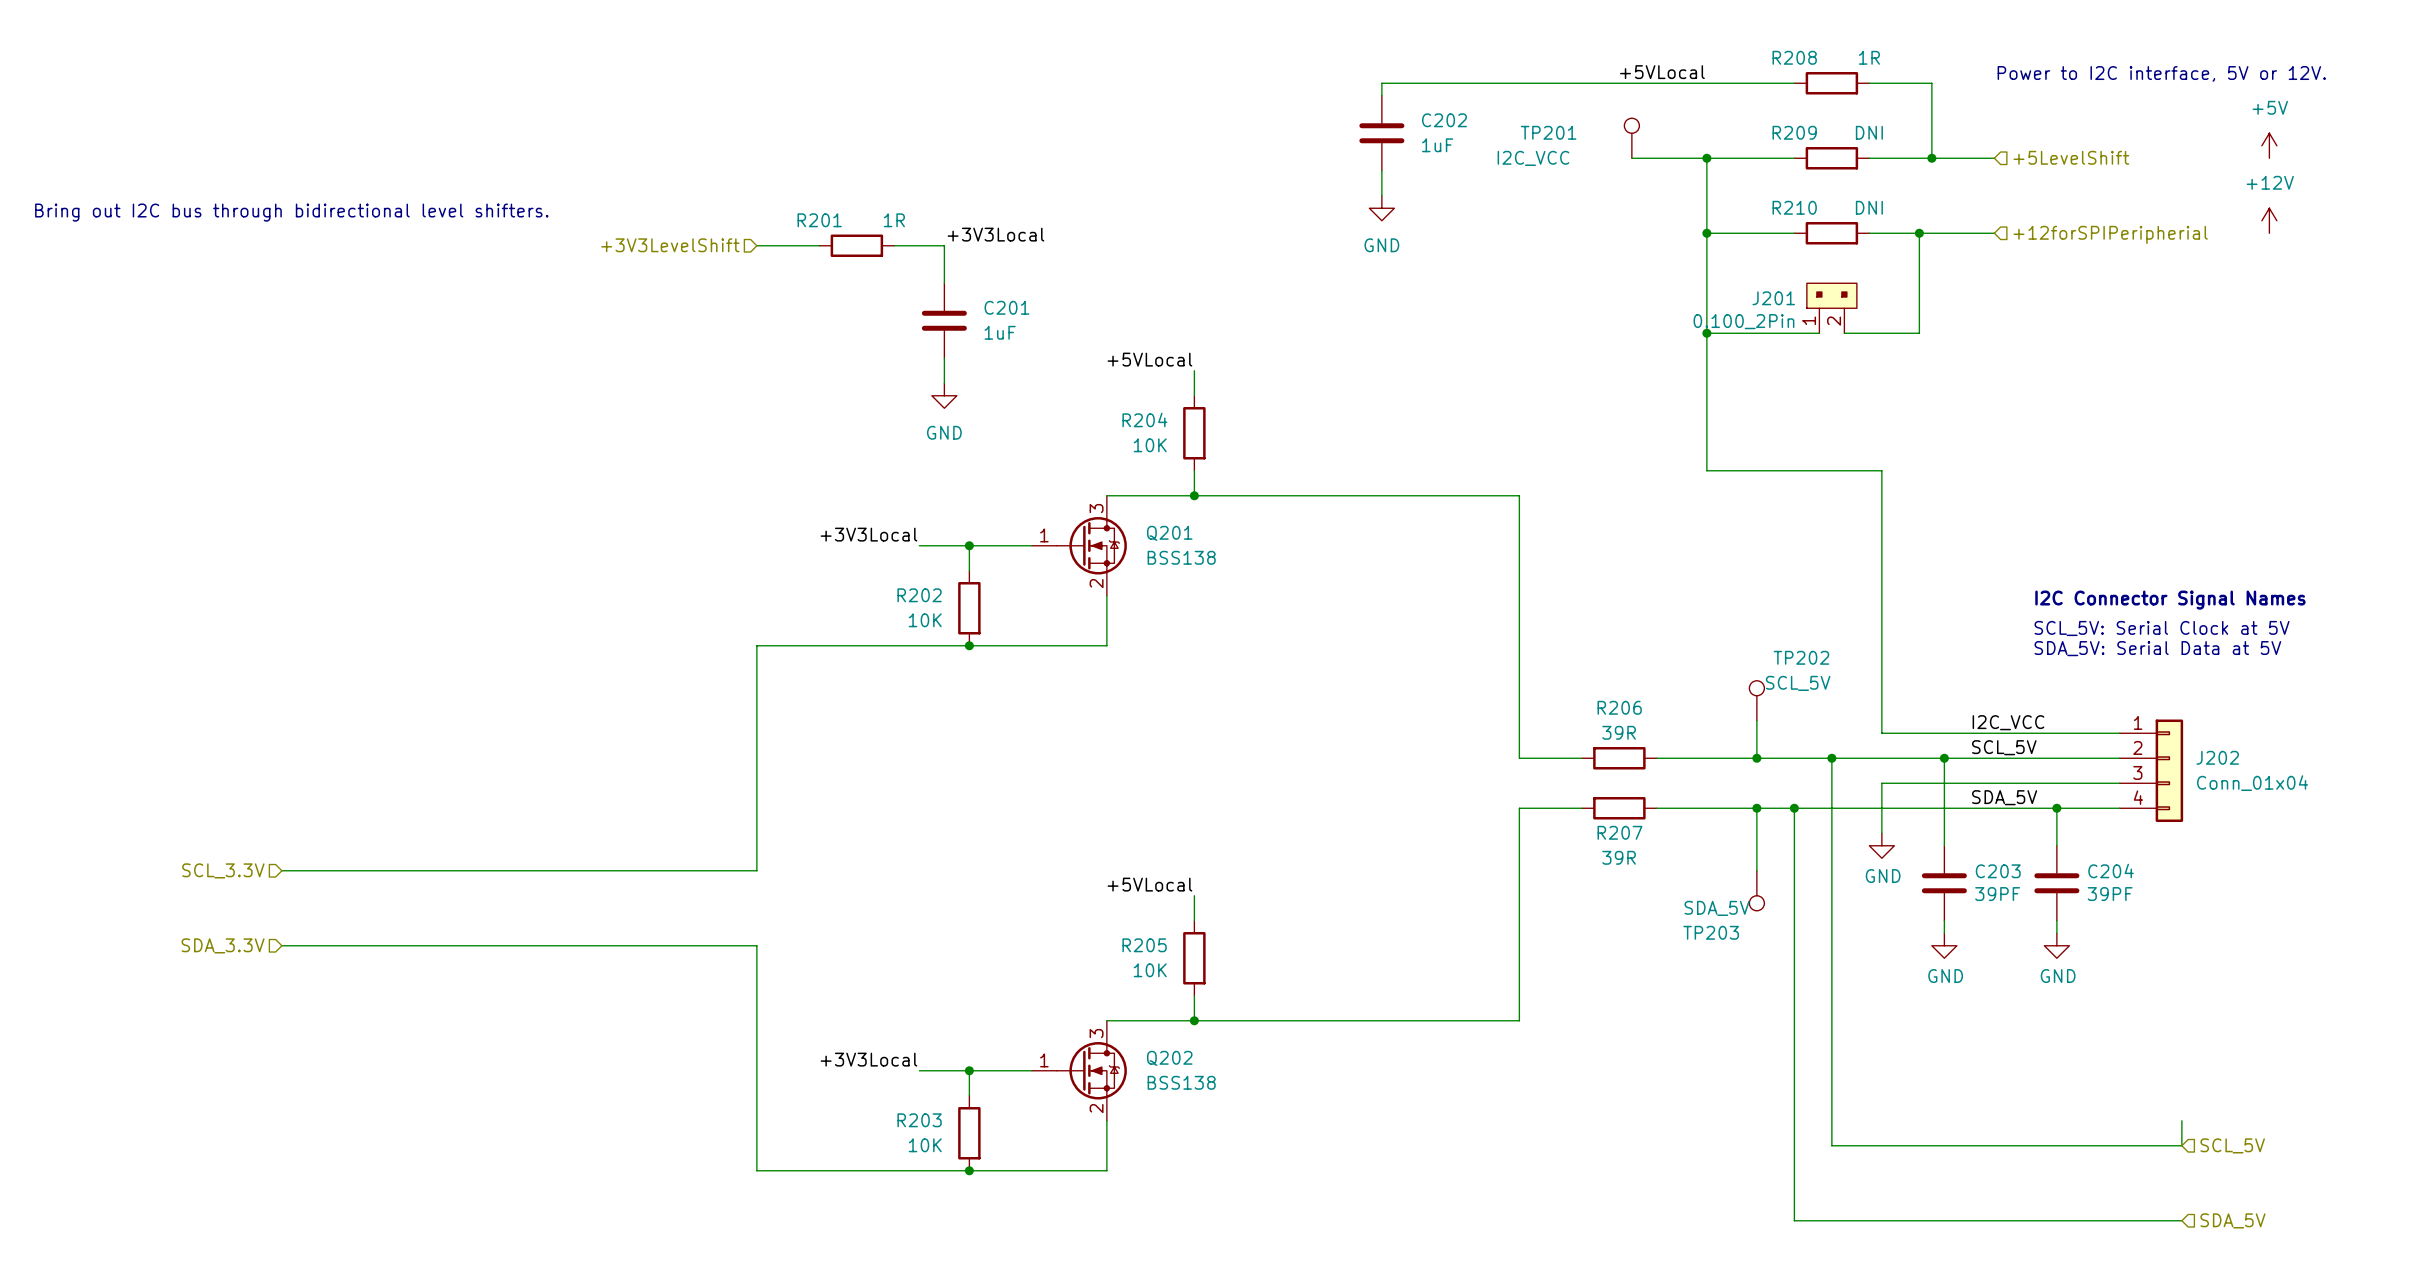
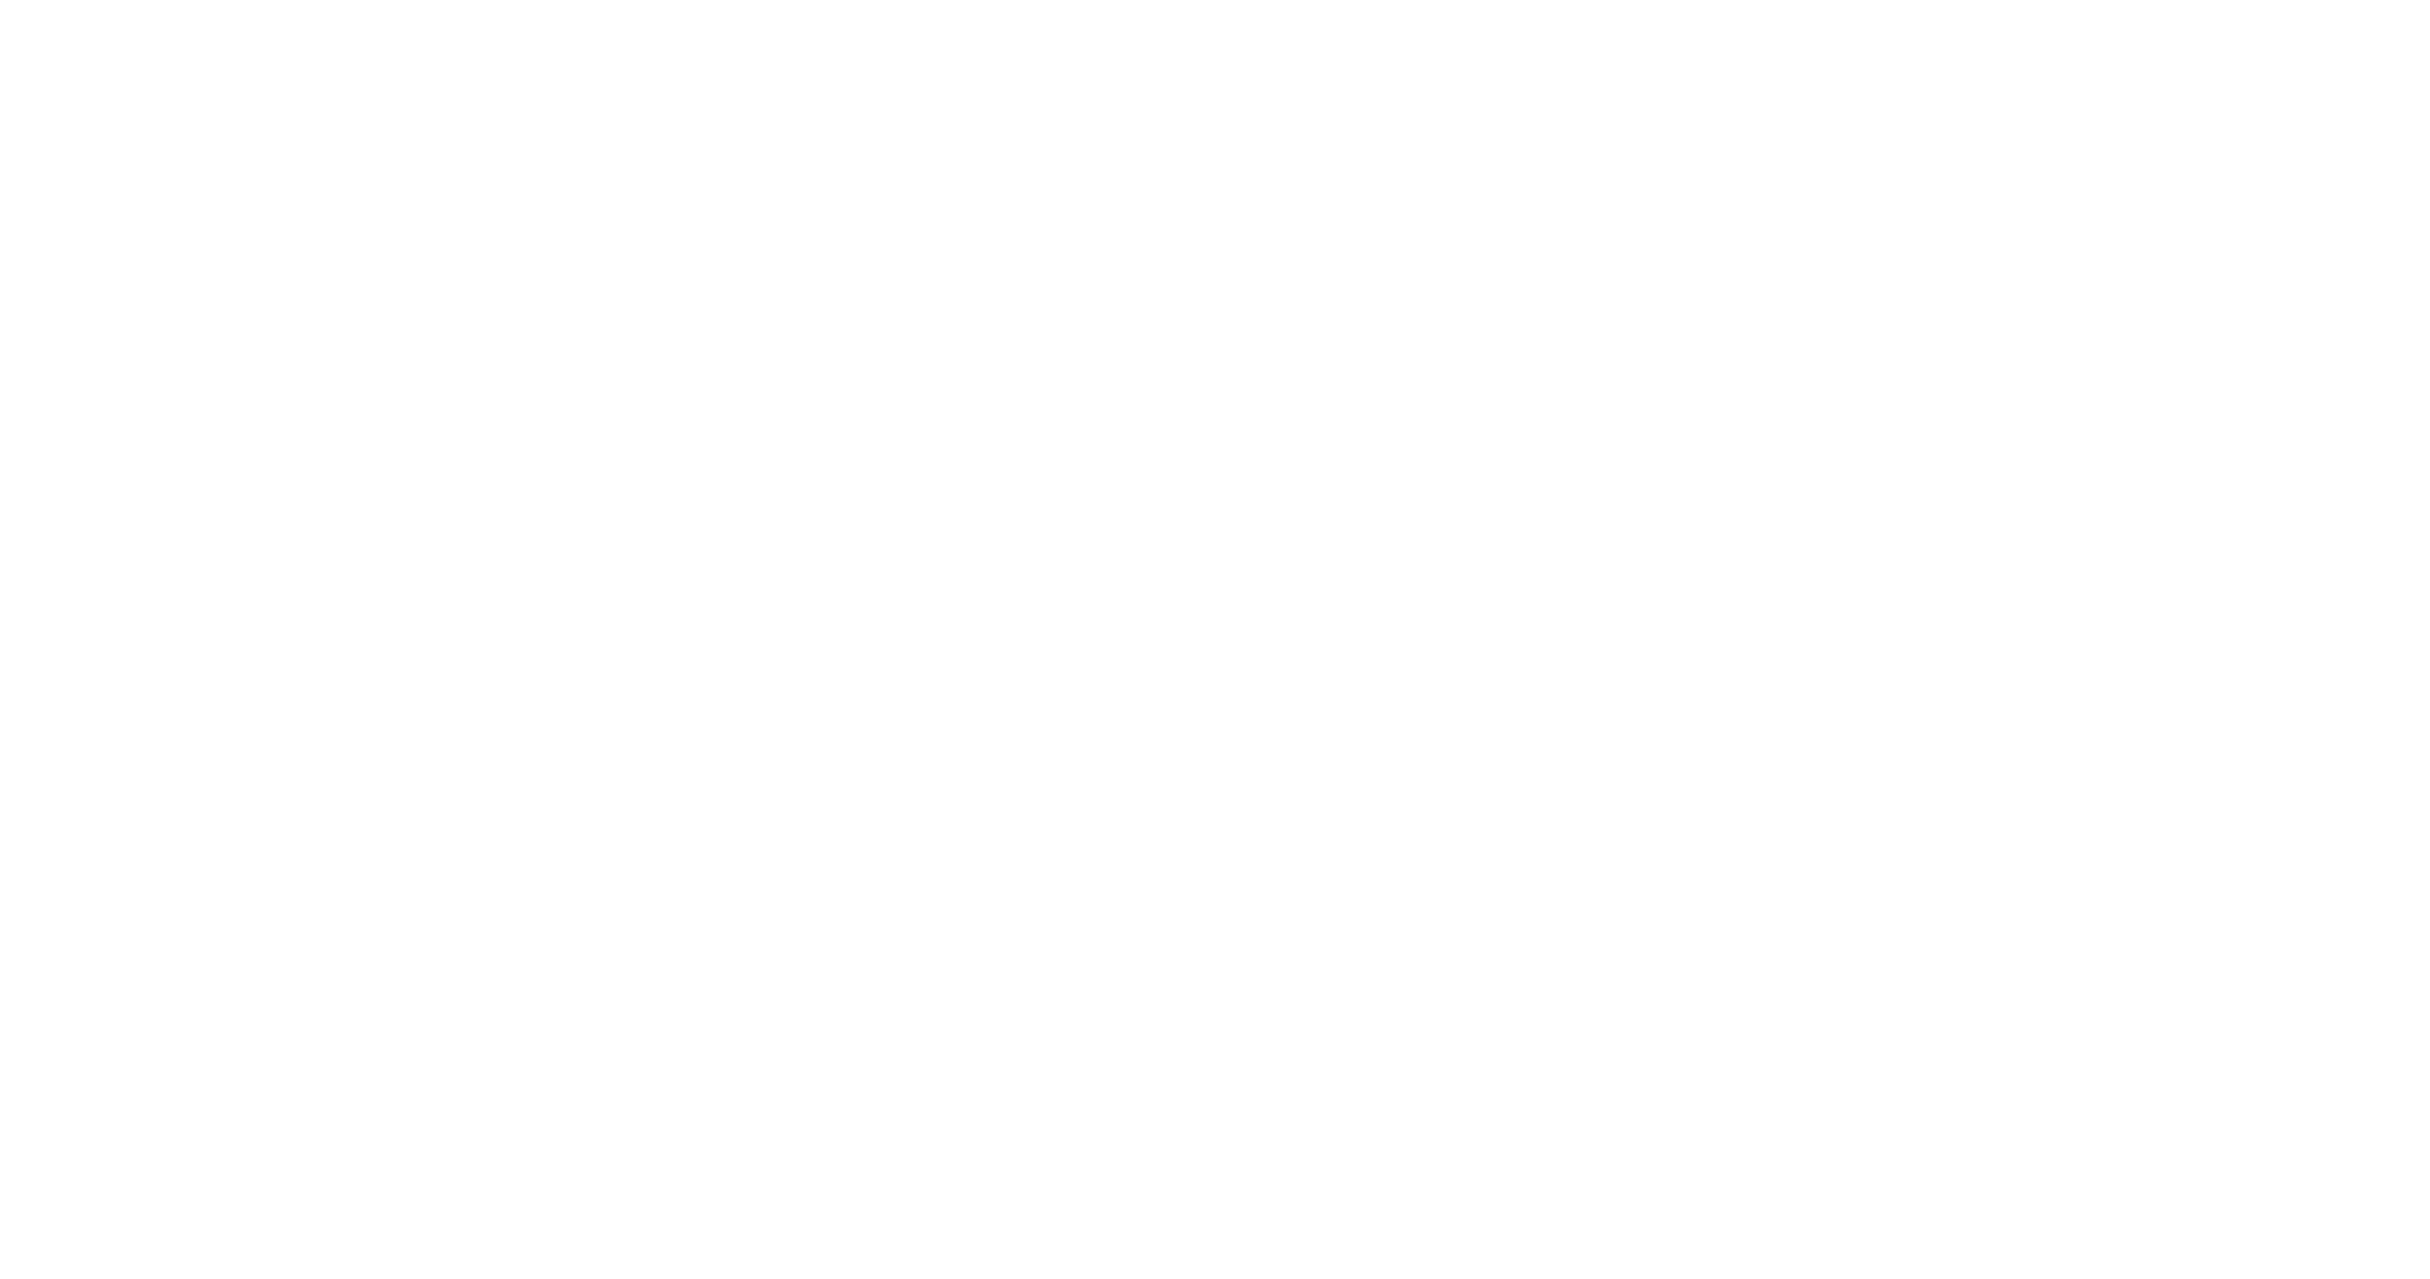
label: +5VLocal (1662, 72) -> none
text: Power to I2C interface, 5V or 12V. (2161, 73) -> none
wire: (1794, 83) (1381, 83) (1381, 95) -> none
R208: 1R (1831, 83) -> none
wire: (1869, 83) (1931, 83) (1931, 158) -> none
C202: 1uF (1381, 133) -> none
TP201: I2C_VCC (1631, 138) -> none
power symbol: +5V (2269, 145) -> none
hierarchical label: +5LevelShift (2071, 157) -> none
wire: (1631, 158) (1794, 158) -> none
wire: (1706, 158) (1706, 470) (1881, 470) (1881, 733) (2119, 733) -> none
junction: (1706, 158) -> none
R209: DNI (1831, 158) -> none
wire: (1869, 158) (1994, 158) -> none
junction: (1931, 158) -> none
wire: (1381, 170) (1381, 195) -> none
power symbol: GND (1381, 208) -> none
text: Bring out I2C bus through bidirectional level shifters. (291, 212) -> none
power symbol: +12V (2269, 220) -> none
wire: (1706, 233) (1794, 233) -> none
junction: (1706, 233) -> none
R210: DNI (1831, 233) -> none
wire: (1869, 233) (1994, 233) -> none
wire: (1919, 233) (1919, 333) (1844, 333) -> none
junction: (1919, 233) -> none
label: +3V3Local (995, 234) -> none
hierarchical label: +12forSPIPeripherial (2110, 234) -> none
hierarchical label: +3V3LevelShift (670, 245) -> none
wire: (756, 245) (819, 245) -> none
R201: 1R (856, 245) -> none
wire: (894, 245) (944, 245) (944, 283) -> none
J201: 0.100_2Pin (1831, 308) -> none
C201: 1uF (944, 320) -> none
wire: (1706, 333) (1819, 333) -> none
junction: (1706, 333) -> none
wire: (944, 358) (944, 383) -> none
label: +5VLocal (1149, 359) -> none
wire: (1194, 370) (1194, 395) -> none
power symbol: GND (944, 395) -> none
R204: 10K (1194, 433) -> none
wire: (1194, 470) (1194, 495) -> none
wire: (1106, 495) (1519, 495) (1519, 758) (1581, 758) -> none
junction: (1194, 495) -> none
label: +3V3Local (868, 534) -> none
wire: (919, 545) (1031, 545) -> none
wire: (969, 545) (969, 570) -> none
junction: (969, 545) -> none
Q201: BSS138 (1079, 545) -> none
wire: (1106, 595) (1106, 645) (756, 645) (756, 870) (281, 870) -> none
text: I2C Connector Signal Names (2170, 600) -> none
R202: 10K (969, 608) -> none
text: SCL_5V: Serial Clock at 5V (2162, 628) -> none
junction: (969, 645) -> none
text: SDA_5V: Serial Data at 5V (2157, 648) -> none
TP202: SCL_5V (1756, 700) -> none
wire: (1756, 720) (1756, 758) -> none
label: I2C_VCC (2008, 722) -> none
label: SCL_5V (2004, 747) -> none
R206: 39R (1619, 758) -> none
wire: (1656, 758) (2119, 758) -> none
junction: (1756, 758) -> none
wire: (1831, 758) (1831, 1145) (2181, 1145) (2181, 1120) -> none
junction: (1831, 758) -> none
wire: (1944, 758) (1944, 845) -> none
junction: (1944, 758) -> none
J202: Conn_01x04 (2151, 770) -> none
wire: (2119, 783) (1881, 783) (1881, 833) -> none
label: SDA_5V (2004, 797) -> none
wire: (1581, 808) (1519, 808) (1519, 1020) (1106, 1020) -> none
R207: 39R (1619, 808) -> none
wire: (1656, 808) (2119, 808) -> none
wire: (1756, 808) (1756, 870) -> none
junction: (1756, 808) -> none
wire: (1794, 808) (1794, 1220) (2181, 1220) -> none
junction: (1794, 808) -> none
wire: (2056, 808) (2056, 845) -> none
junction: (2056, 808) -> none
power symbol: GND (1881, 845) -> none
hierarchical label: SCL_3.3V (223, 870) -> none
C203: 39PF (1944, 883) -> none
C204: 39PF (2056, 883) -> none
label: +5VLocal (1149, 884) -> none
TP203: SDA_5V (1756, 890) -> none
wire: (1194, 895) (1194, 920) -> none
wire: (1944, 920) (1944, 933) -> none
wire: (2056, 920) (2056, 933) -> none
hierarchical label: SDA_3.3V (223, 945) -> none
wire: (281, 945) (756, 945) (756, 1170) (1106, 1170) (1106, 1120) -> none
power symbol: GND (1944, 945) -> none
power symbol: GND (2056, 945) -> none
R205: 10K (1194, 958) -> none
wire: (1194, 995) (1194, 1020) -> none
junction: (1194, 1020) -> none
label: +3V3Local (868, 1059) -> none
wire: (919, 1070) (1031, 1070) -> none
wire: (969, 1070) (969, 1095) -> none
junction: (969, 1070) -> none
Q202: BSS138 (1079, 1070) -> none
R203: 10K (969, 1133) -> none
hierarchical label: SCL_5V (2232, 1145) -> none
junction: (969, 1170) -> none
hierarchical label: SDA_5V (2232, 1220) -> none

